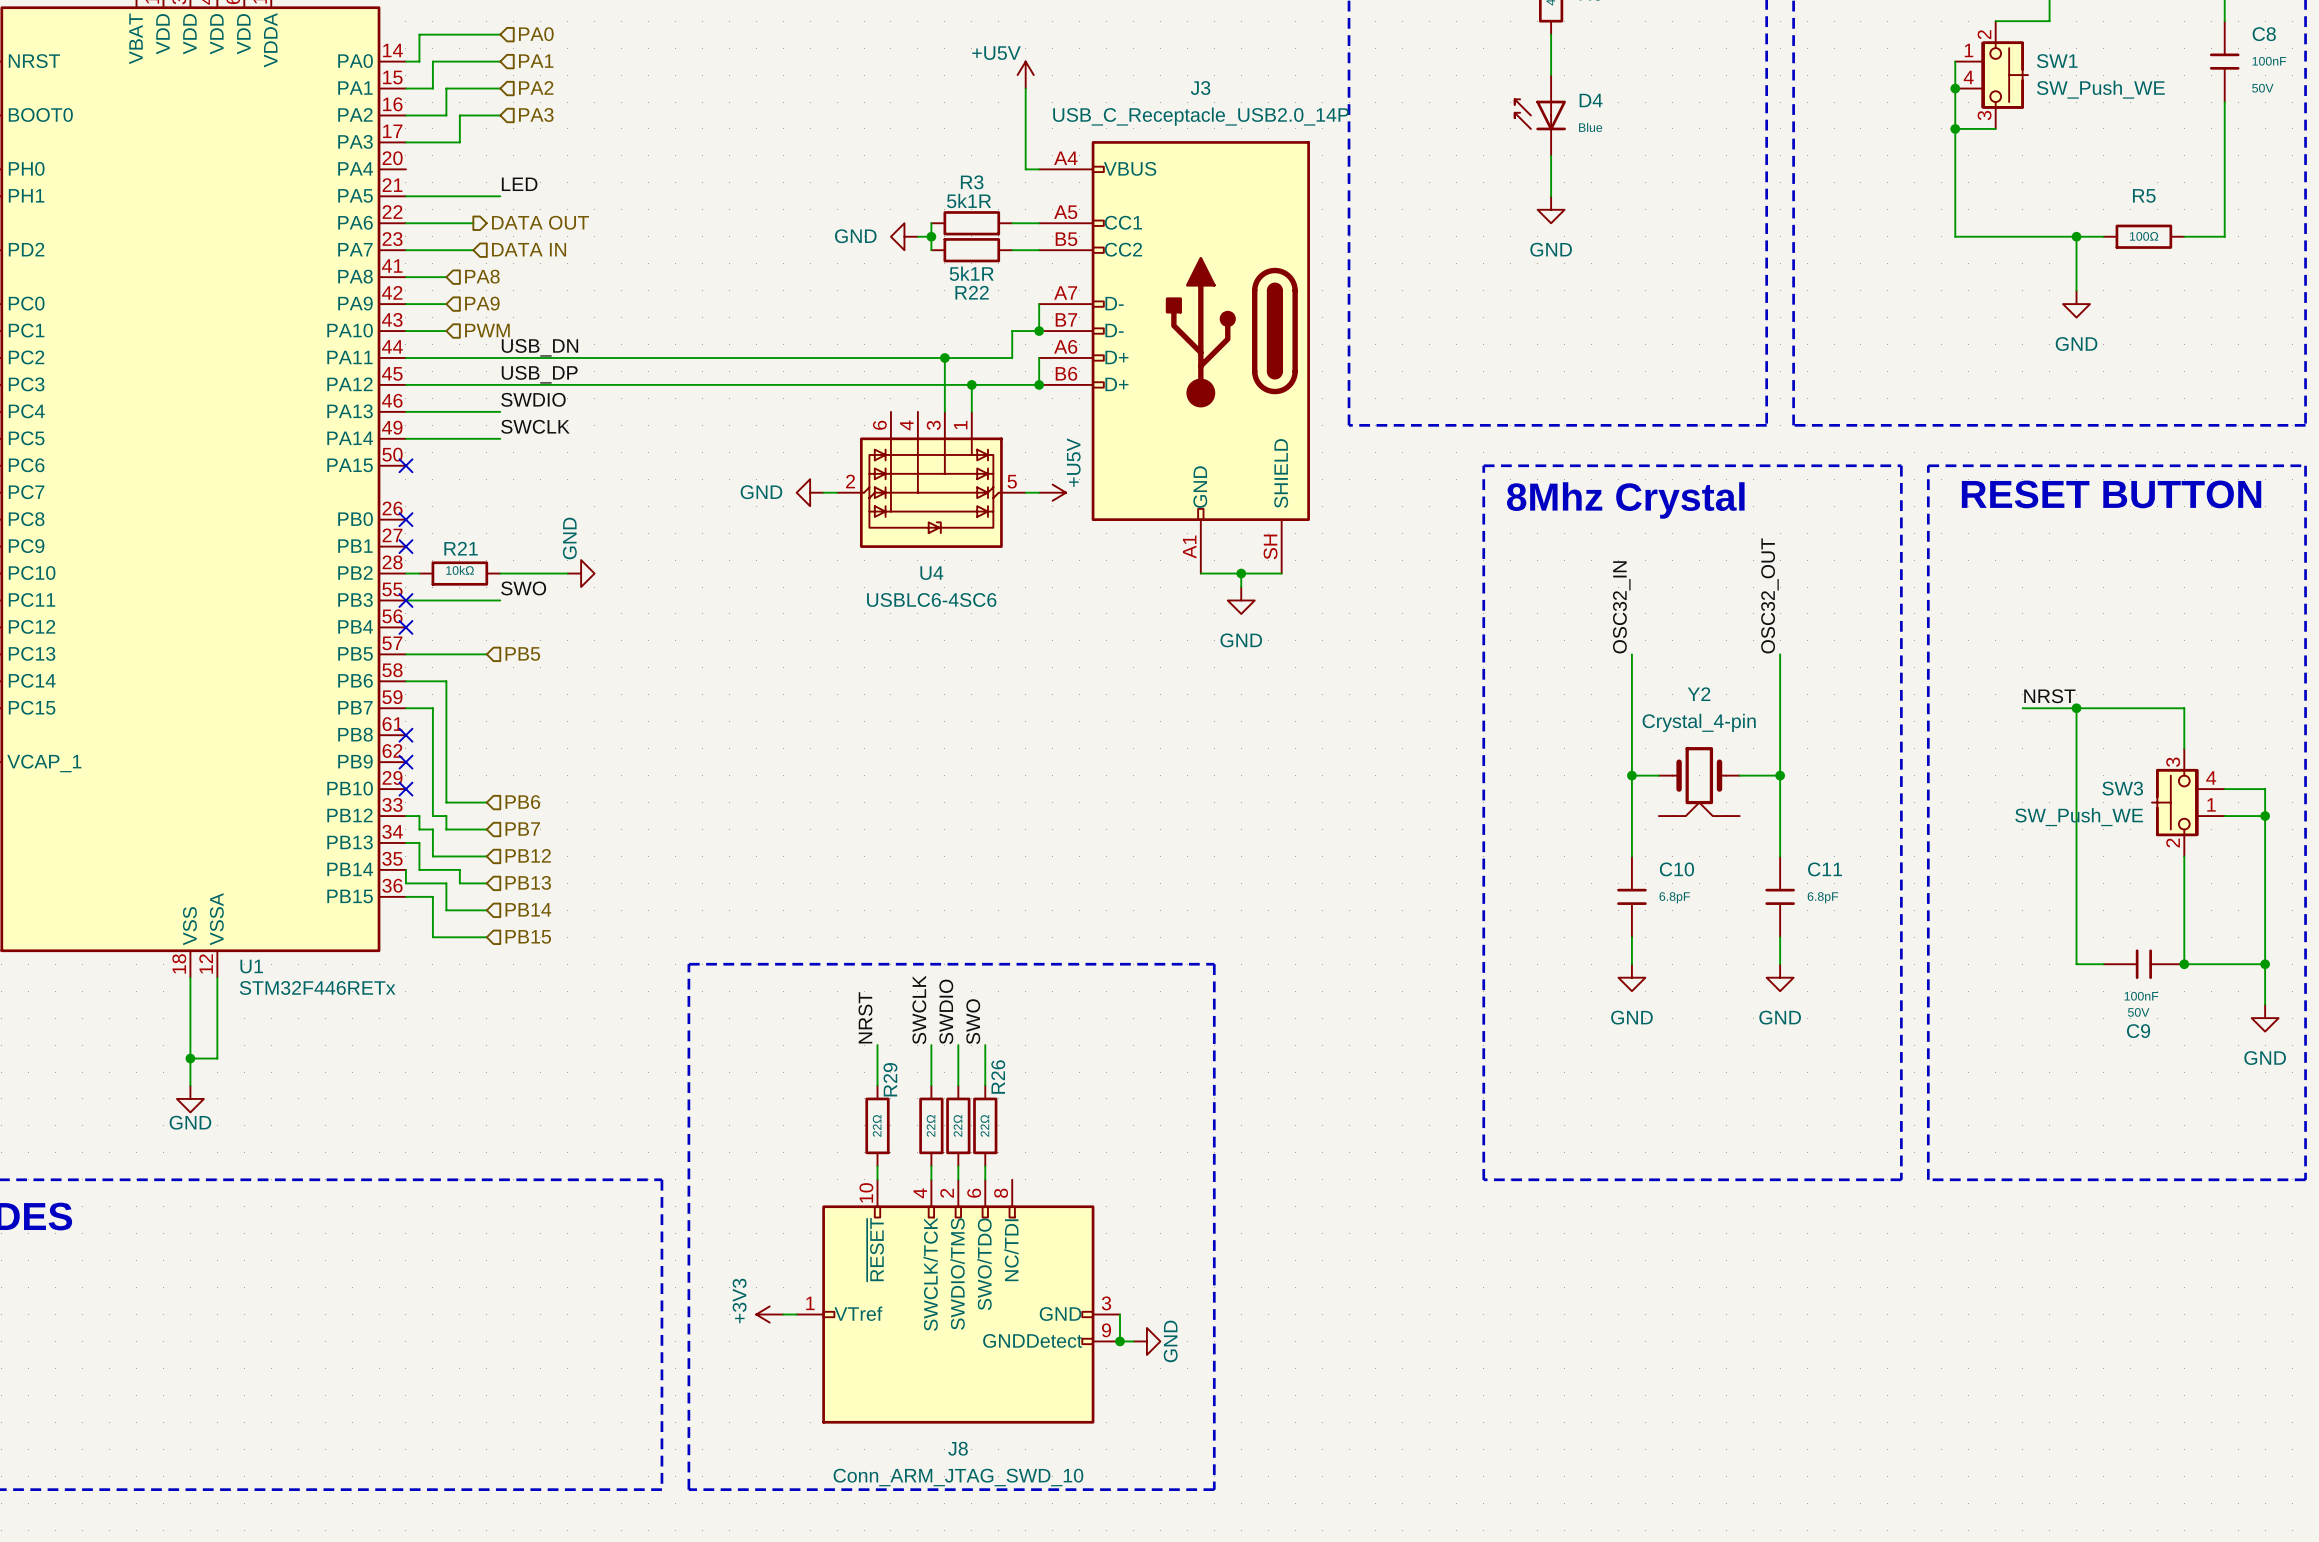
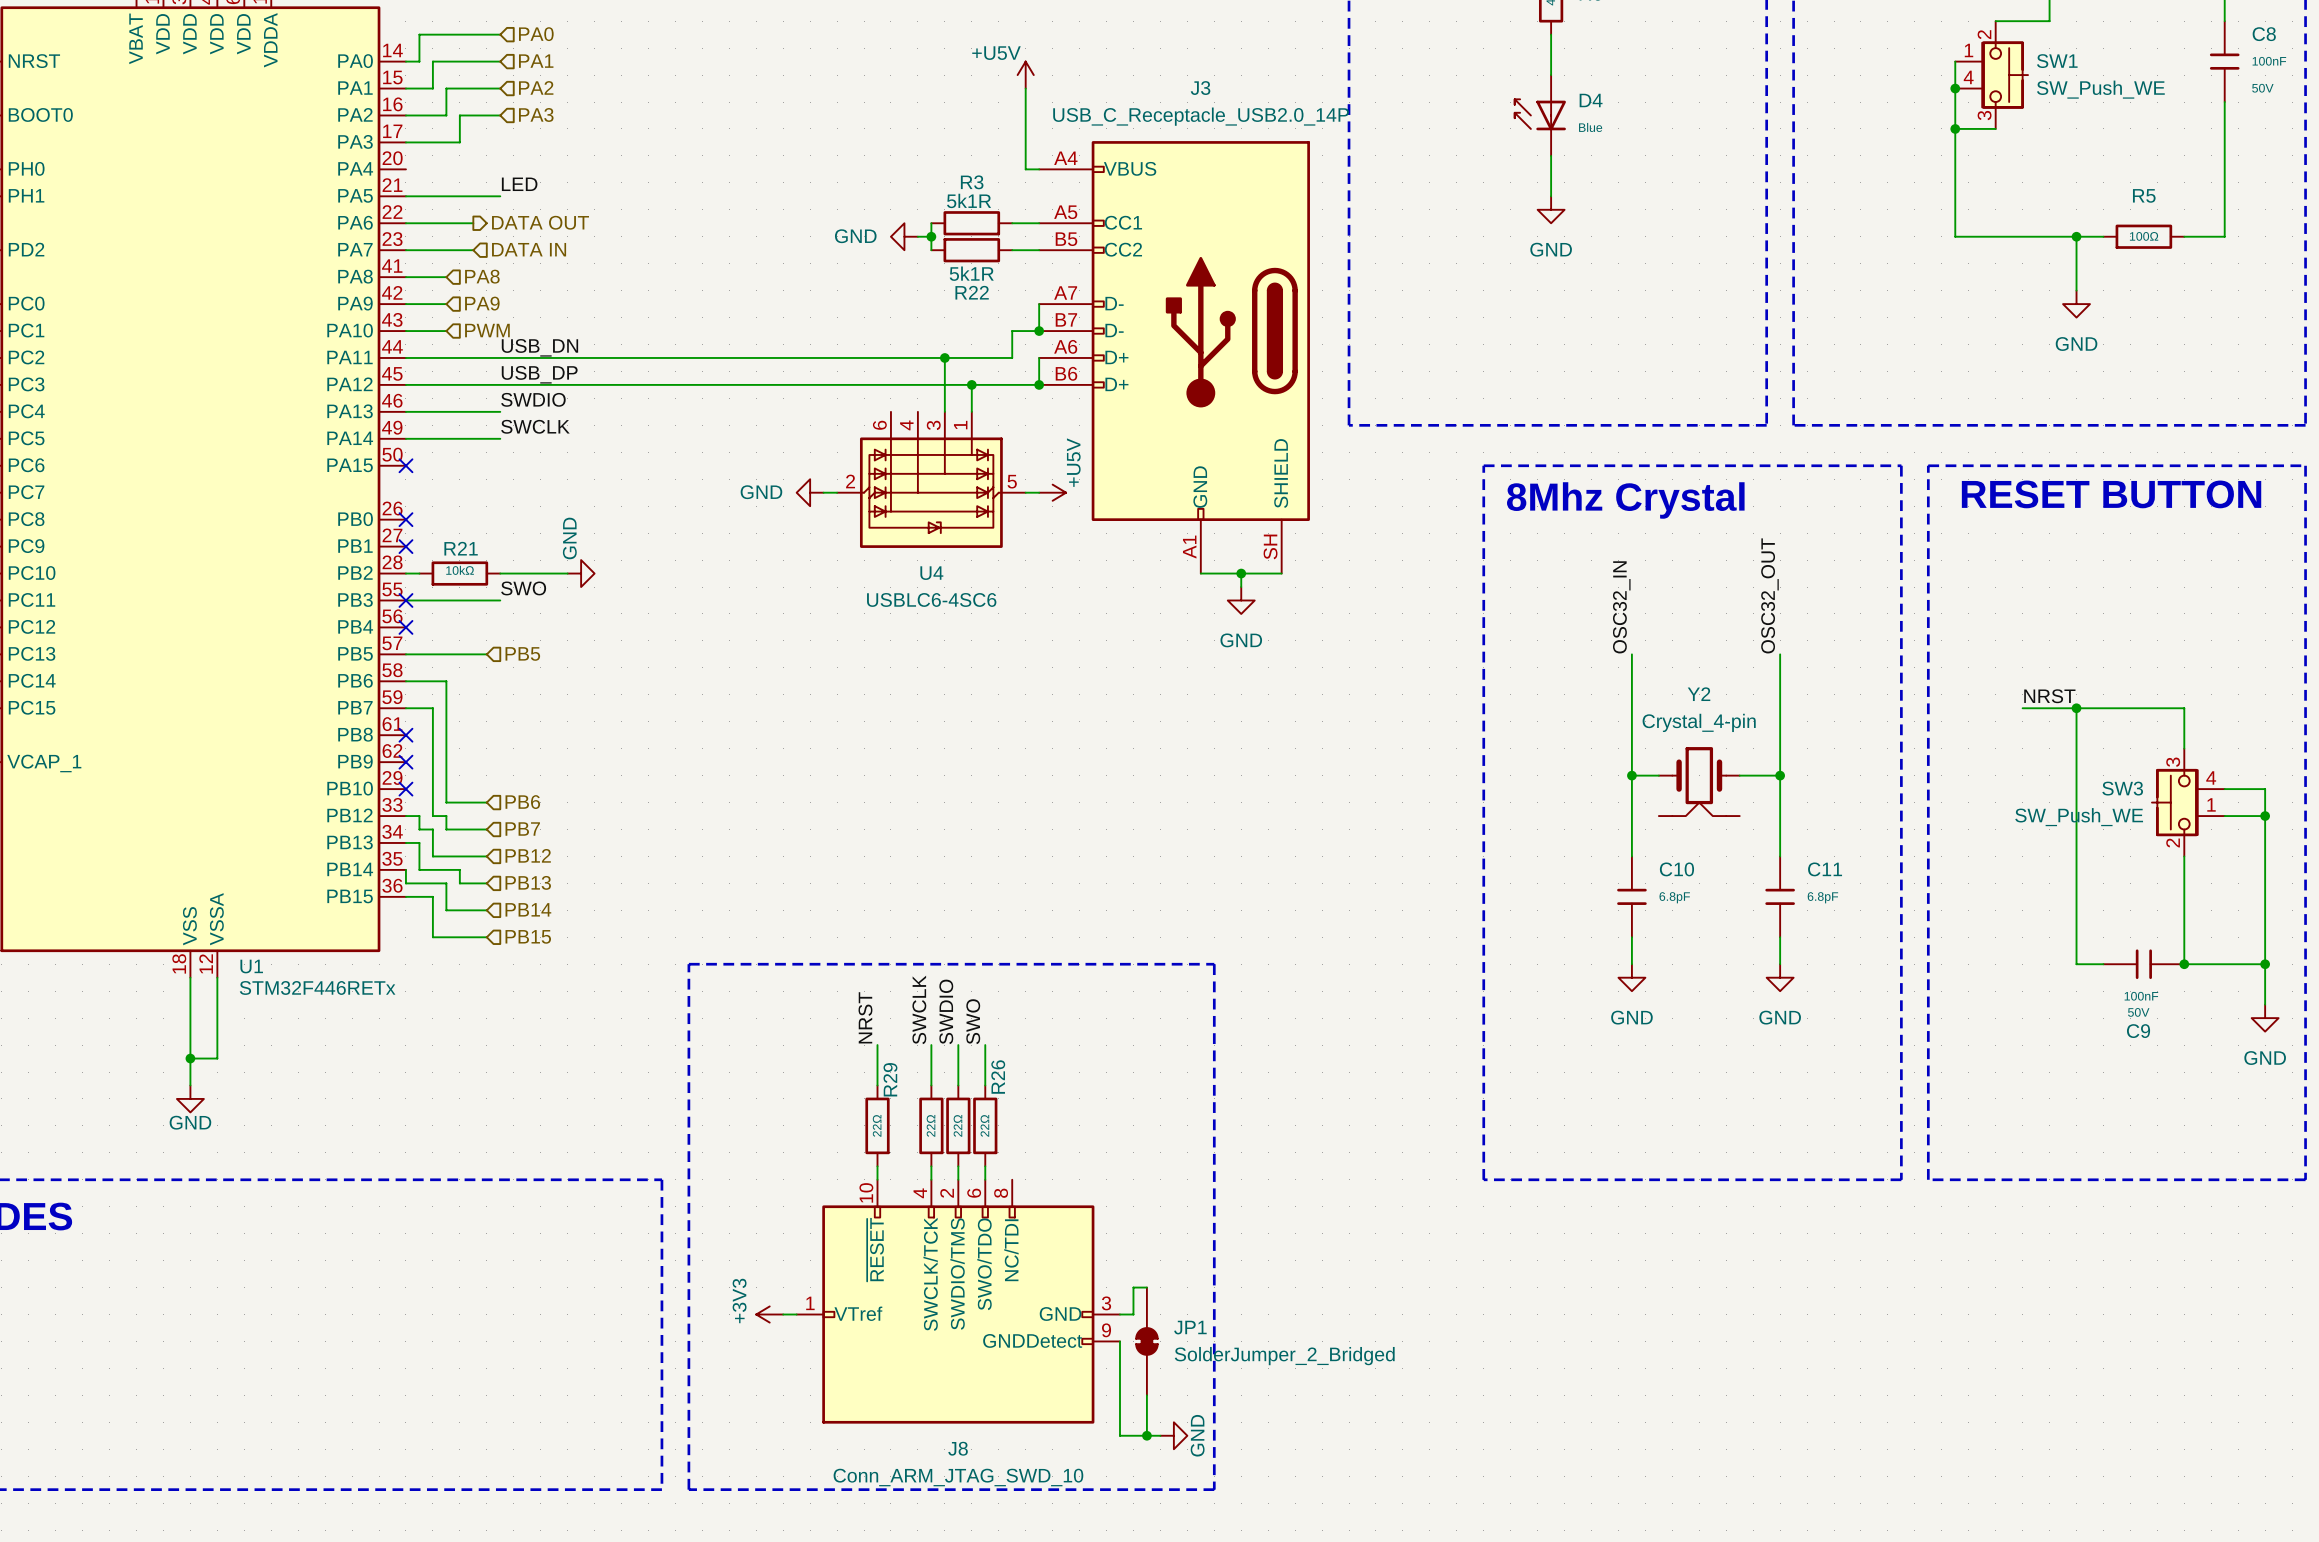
wire: (1119, 1314) (1119, 1341) (1133, 1341) -> (1119, 1314) (1133, 1314) (1133, 1287) (1146, 1287)
wire: none -> (1119, 1341) (1119, 1435) (1160, 1435)
junction: (1119, 1341) -> none
power symbol position: GND (1146, 1341) -> GND (1173, 1435)
JP1: none -> SolderJumper_2_Bridged (1146, 1341)
wire: none -> (1146, 1395) (1146, 1435)
junction: none -> (1146, 1435)

